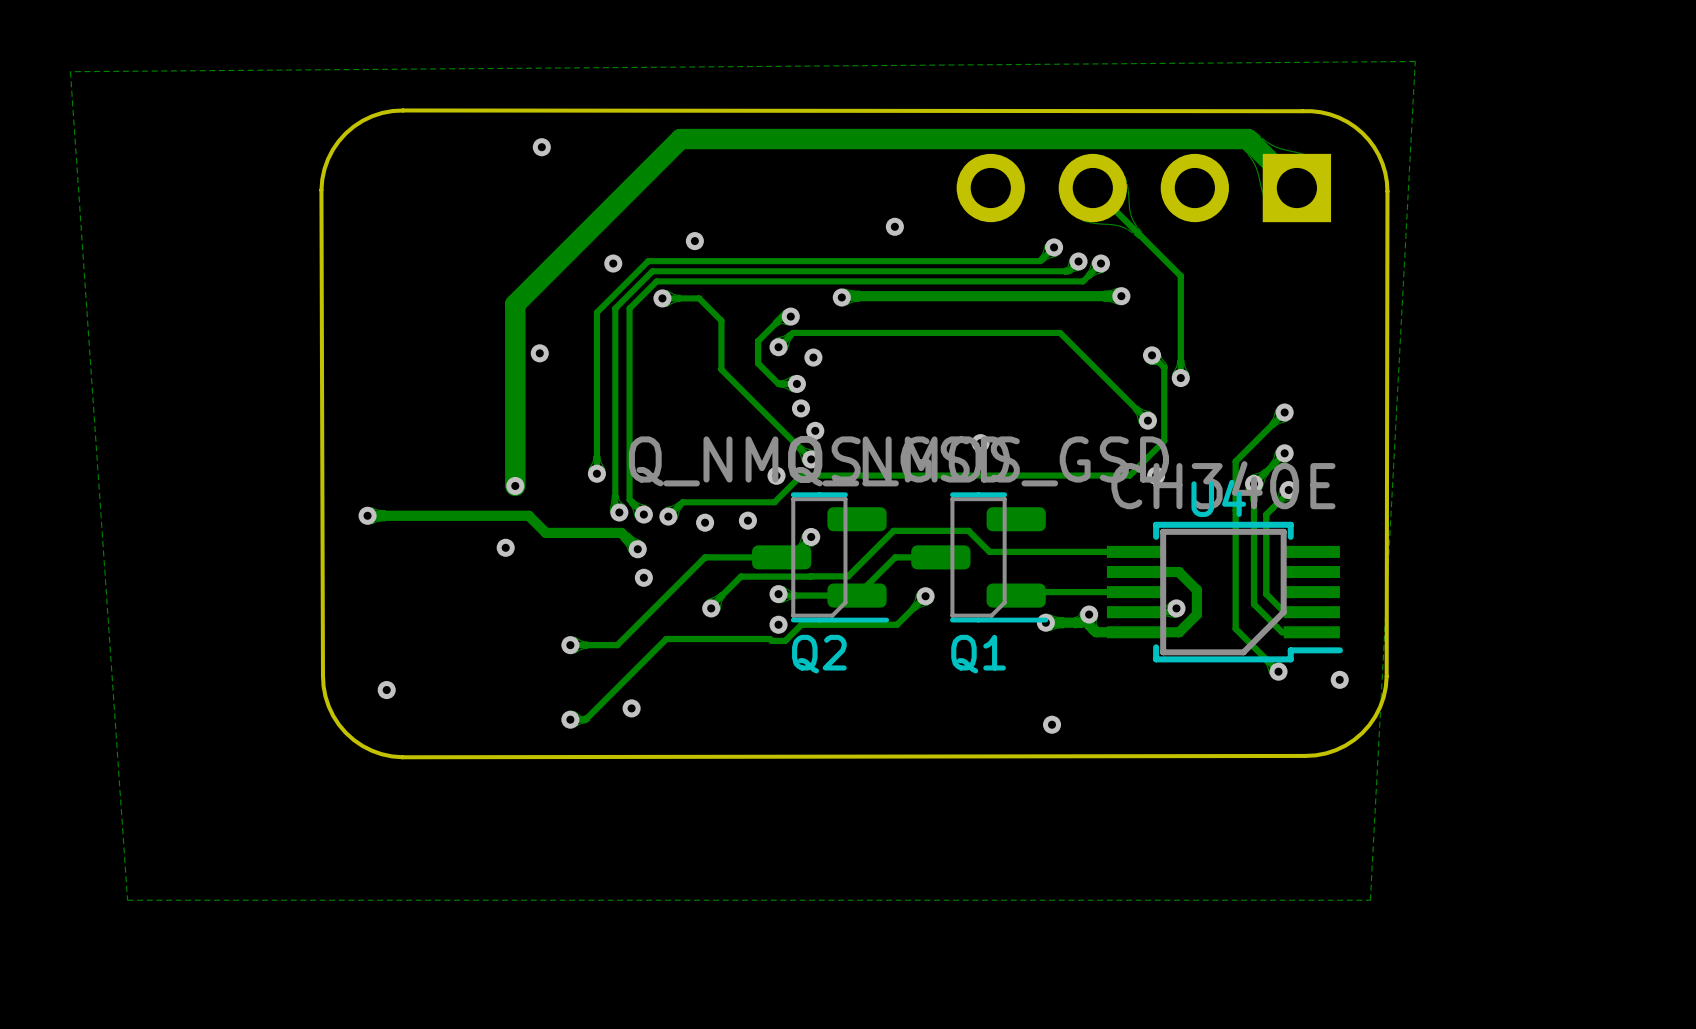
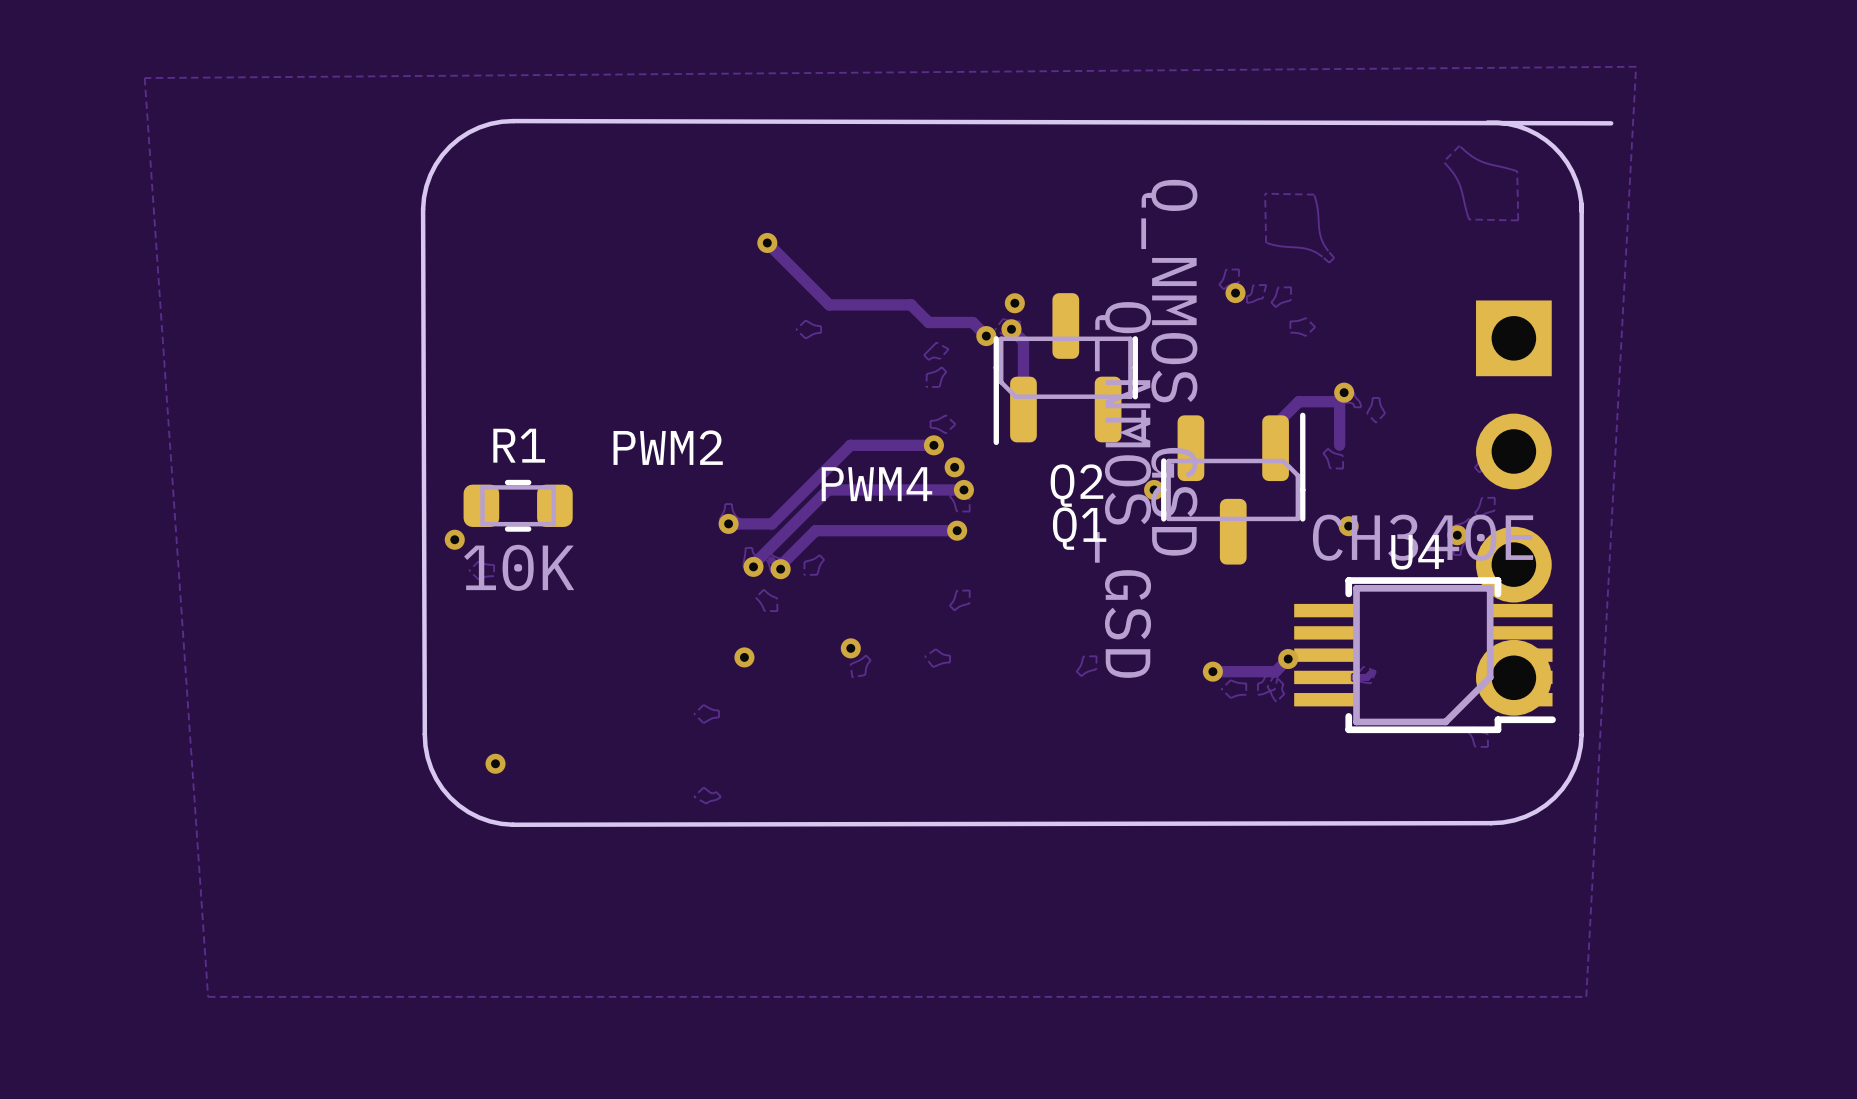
board edge: (403, 110) (1311, 111) (1330, 114) (1347, 121) (1362, 132) (1374, 147) (1385, 172) (1387, 191) (1386, 676) (1383, 697) (1375, 716) (1362, 733) (1345, 745) (1325, 753) (1305, 755) (402, 757) (371, 750) (353, 739) (339, 724) (328, 706) (323, 686) (321, 190) -> (1581, 204) (1580, 746) (1574, 769) (1569, 779) (1562, 789) (1545, 805) (1525, 816) (1514, 820) (1491, 823) (513, 824) (489, 821) (468, 812) (458, 805) (442, 788) (431, 768) (425, 745) (423, 209)
board edge: none -> (513, 121) (1611, 123)
board edge: none -> (1487, 122) (1518, 126) (1537, 134) (1553, 146) (1567, 162) (1576, 181) (1581, 211)
via: (541, 147) -> none
track: (1092, 188) (1180, 275) (1180, 378) -> none
part rotation: 0° (1143, 188) -> 90° counterclockwise (1513, 508)
part position: (1143, 188) -> (1513, 508)
track: (1296, 188) (1247, 139) (680, 139) (515, 304) (515, 485) -> none
track: none -> (767, 242) (829, 304) (911, 304) (928, 322) (972, 322) (986, 336)
via: none -> (767, 242)
via: (894, 226) -> none
via: (694, 241) -> none
track: (1054, 247) (1040, 261) (648, 261) (596, 312) (596, 473) -> none
via: (1054, 247) -> none
track: (1078, 261) (1068, 271) (652, 271) (615, 308) (615, 508) (619, 512) -> none
via: (1078, 261) -> none
via: (613, 263) -> none
track: (1100, 263) (1083, 281) (656, 281) (629, 308) (629, 499) (635, 505) -> none
via: (1100, 263) -> none
via: none -> (1235, 293)
via: none -> (1014, 303)
track: (1121, 296) (841, 297) -> none
via: (1121, 296) -> none
via: (841, 297) -> none
track: (662, 298) (699, 298) (721, 320) (721, 369) (811, 459) -> none
via: (662, 298) -> none
track: none -> (1011, 329) (1023, 341) (1023, 409)
via: none -> (1011, 329)
via: none -> (986, 336)
track: (790, 316) (782, 316) (758, 341) (758, 363) (778, 383) (796, 383) -> none
via: (790, 316) -> none
track: (778, 347) (792, 332) (1060, 332) (1147, 420) -> none
via: (778, 347) -> none
via: (539, 353) -> none
track: (1152, 355) (1164, 367) (1164, 441) (1129, 475) (801, 475) (774, 502) (682, 502) (668, 516) -> none
via: (813, 357) -> none
via: (1180, 378) -> none
via: (796, 383) -> none
track: none -> (1275, 425) (1298, 401) (1339, 401) (1339, 445)
track: none -> (933, 445) (850, 445) (771, 523) (737, 523) (735, 521)
via: none -> (933, 445)
text: none -> PWM2 (668, 447)
via: (801, 408) -> none
track: (1284, 412) (1235, 461) (1235, 628) (1278, 671) -> none
via: (1284, 412) -> none
via: (1147, 420) -> none
via: none -> (954, 467)
via: (815, 430) -> none
text: none -> PWM4 (876, 484)
track: none -> (963, 489) (828, 489) (753, 564)
via: none -> (963, 489)
track: (1284, 453) (1254, 483) (1254, 604) (1281, 632) (1311, 632) -> none
via: (1284, 453) -> none
R1: none -> 10K (518, 505)
via: (811, 459) -> none
via: (776, 475) -> none
track: none -> (957, 530) (815, 530) (778, 569)
via: none -> (957, 530)
via: (515, 485) -> none
track: (1288, 490) (1266, 514) (1266, 594) (1284, 612) (1311, 612) -> none
via: (1288, 490) -> none
track: (367, 515) (528, 515) (545, 532) (621, 532) (637, 549) -> none
via position: (367, 515) -> (454, 539)
via: (668, 516) -> none
via: (747, 520) -> none
via: (705, 522) -> none
track: (811, 536) (790, 557) (705, 557) (617, 645) (570, 645) -> none
via: (811, 536) -> none
via: (505, 547) -> none
via: (637, 549) -> none
track: (1135, 551) (989, 551) (968, 530) (893, 530) (848, 576) (811, 576) -> none
Q2 rotation: 0° (820, 557) -> 90° clockwise (1065, 369)
Q2 position: (820, 557) -> (1065, 369)
track: (940, 557) (895, 557) (857, 595) (778, 594) -> none
Q1 rotation: 0° (979, 557) -> 90° counterclockwise (1233, 488)
Q1 position: (979, 557) -> (1233, 488)
track: (1135, 572) (1178, 572) (1196, 590) (1196, 614) (1179, 632) (1096, 632) (1089, 625) (1089, 614) (1080, 622) (1045, 622) -> none
track: (810, 576) (740, 576) (711, 608) -> none
via: (643, 577) -> none
track: (1135, 592) (1019, 592) (1016, 595) -> none
via: none -> (744, 657)
via: (778, 594) -> none
track: none -> (1288, 659) (1275, 671) (1212, 671)
track: (925, 596) (897, 624) (801, 624) (785, 640) (771, 640) (769, 639) (666, 639) (585, 719) (570, 719) -> none
via: (925, 596) -> none
via position: (711, 608) -> (850, 648)
via: (1176, 608) -> none
via position: (1089, 614) -> (1288, 659)
via position: (1045, 622) -> (1212, 671)
via: (778, 624) -> none
via: (570, 645) -> none
Q1 name position: Q1 (978, 654) -> Q1 (1079, 528)
via: (1278, 671) -> none
via: (1339, 679) -> none
via: (631, 708) -> none
via: (570, 719) -> none
via: (1052, 724) -> none

